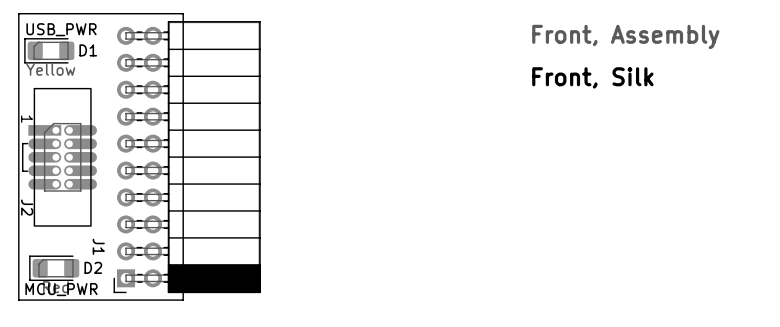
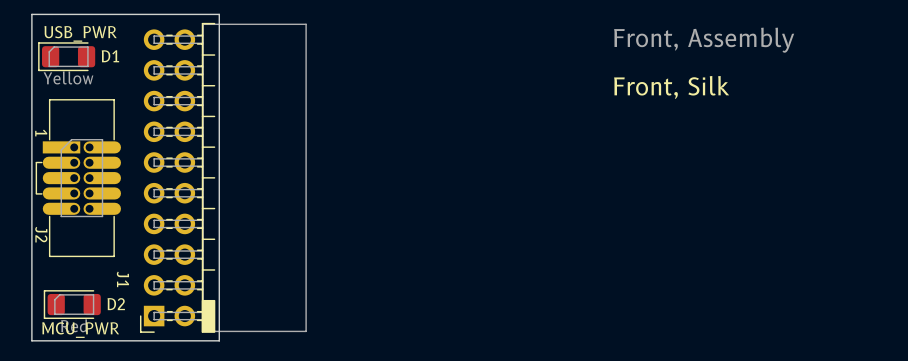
J1 footprint: [113, 21, 261, 294] -> [139, 22, 307, 333]
J2 footprint: [22, 88, 97, 227] -> [35, 99, 122, 258]

